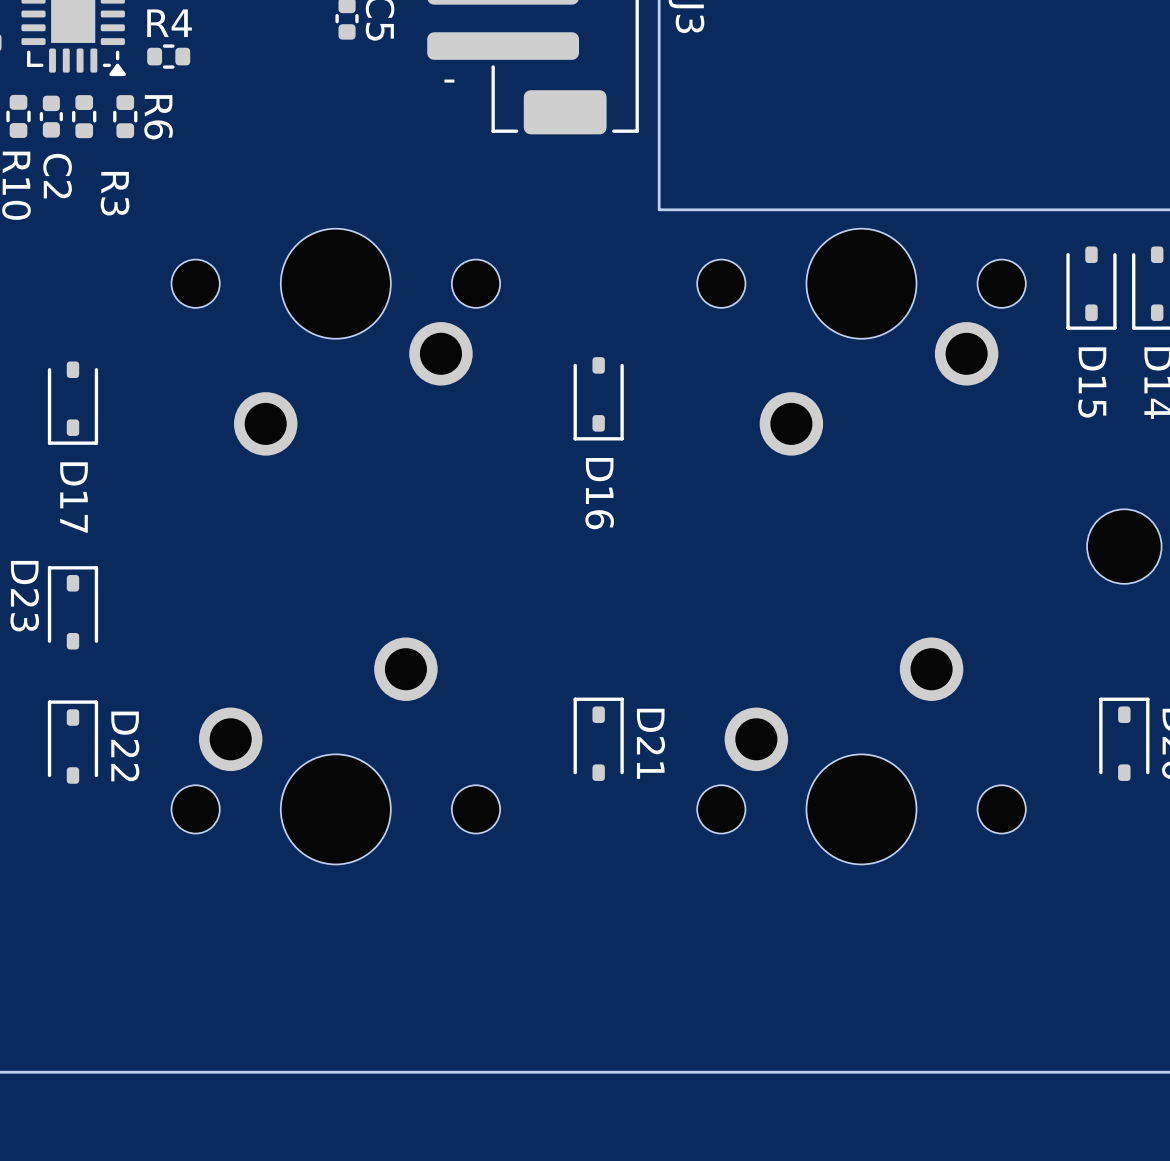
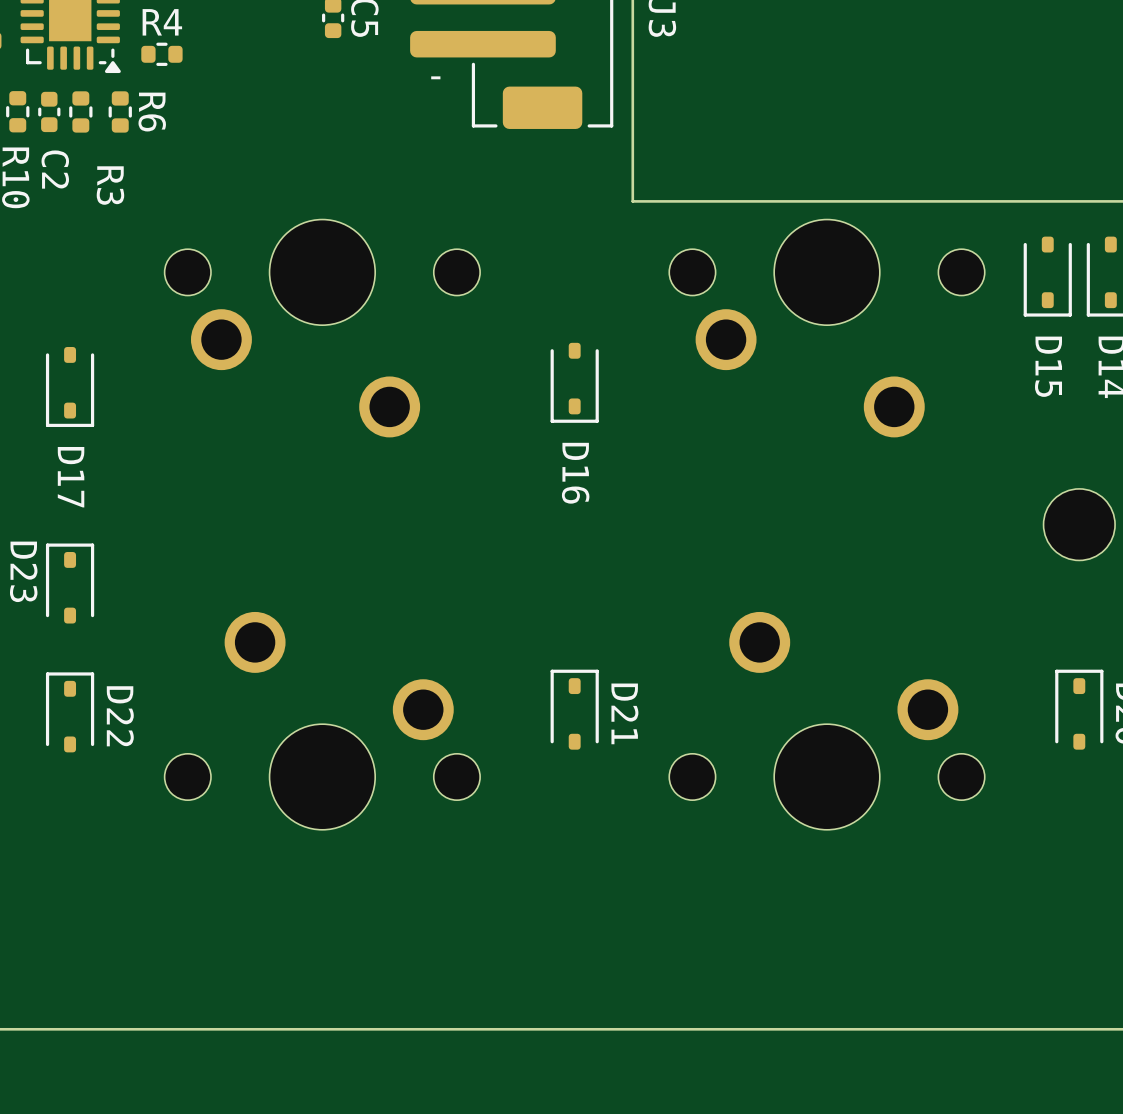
part side: bottom (335, 342) -> top (322, 328)
part side: bottom (861, 342) -> top (826, 328)
part side: bottom (335, 750) -> top (322, 720)
part side: bottom (861, 750) -> top (826, 720)

